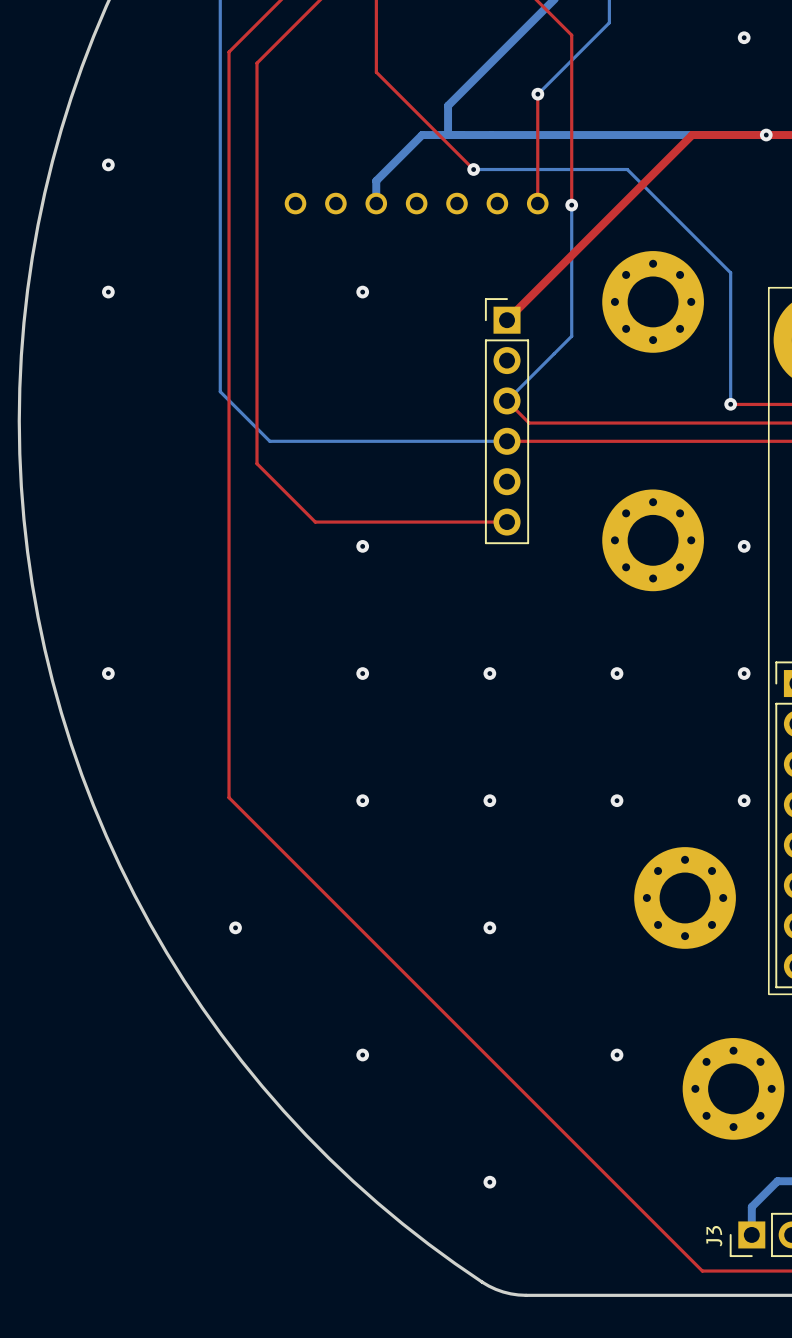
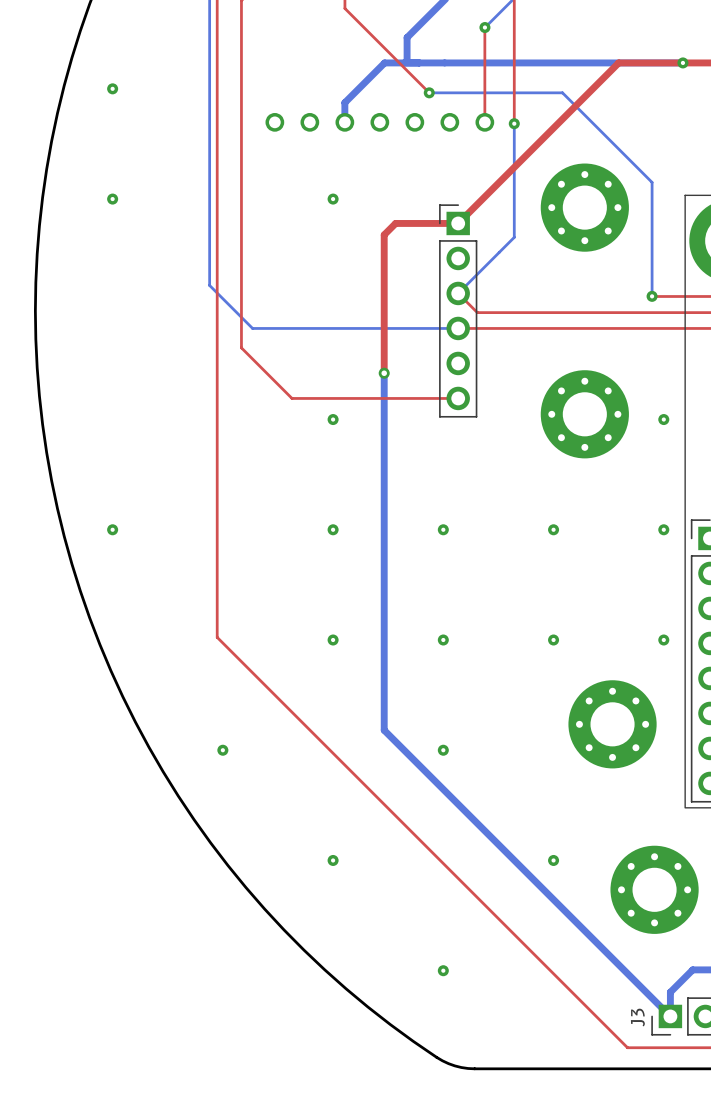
top track: none -> (458, 223) (395, 223) (384, 234) (384, 373)
bottom track: none -> (384, 373) (384, 730) (670, 1016)
via: none -> (384, 373)

